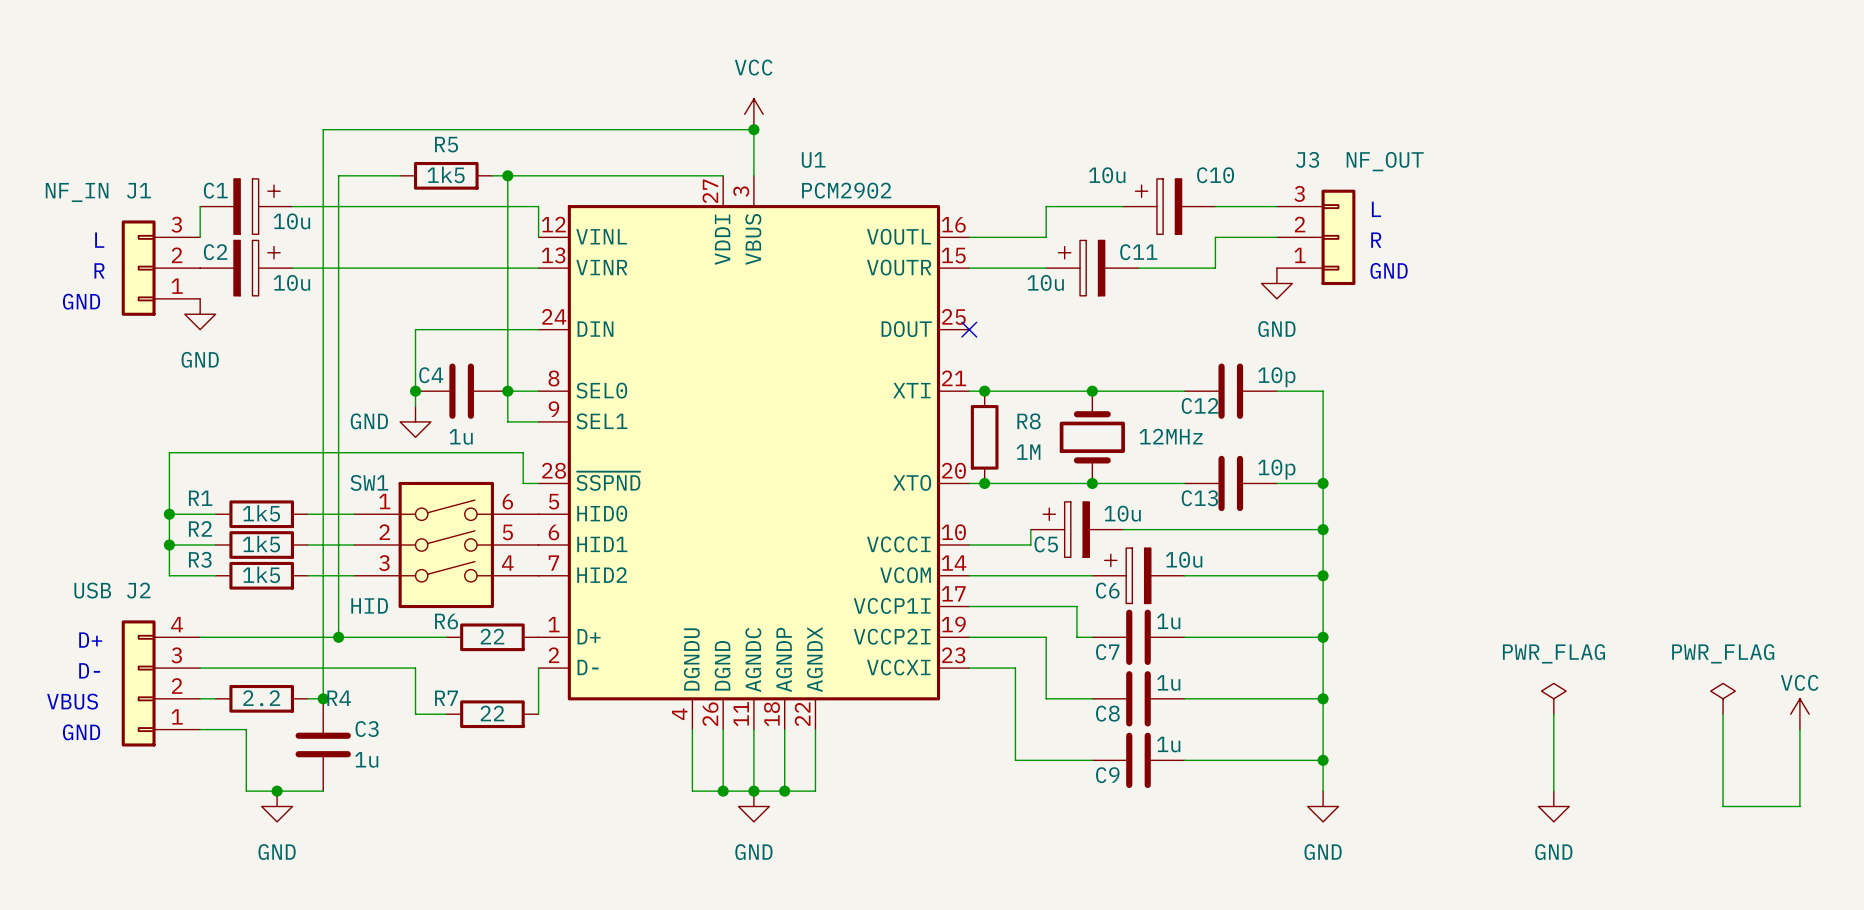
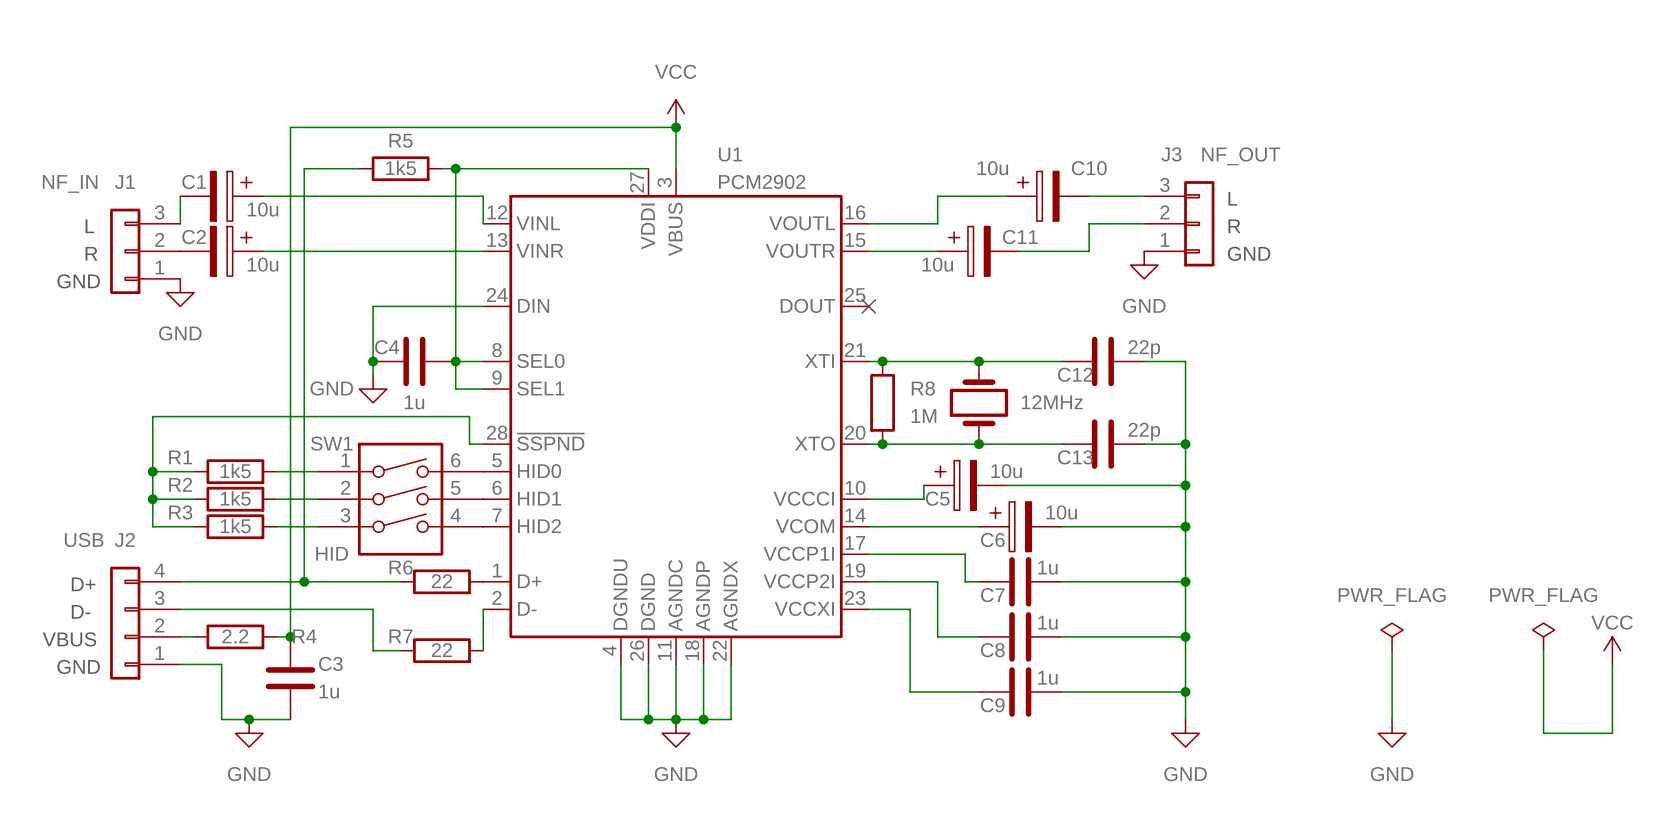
C12 value: 10p (1276, 377) -> 22p (1144, 349)
C13 value: 10p (1276, 469) -> 22p (1144, 431)

